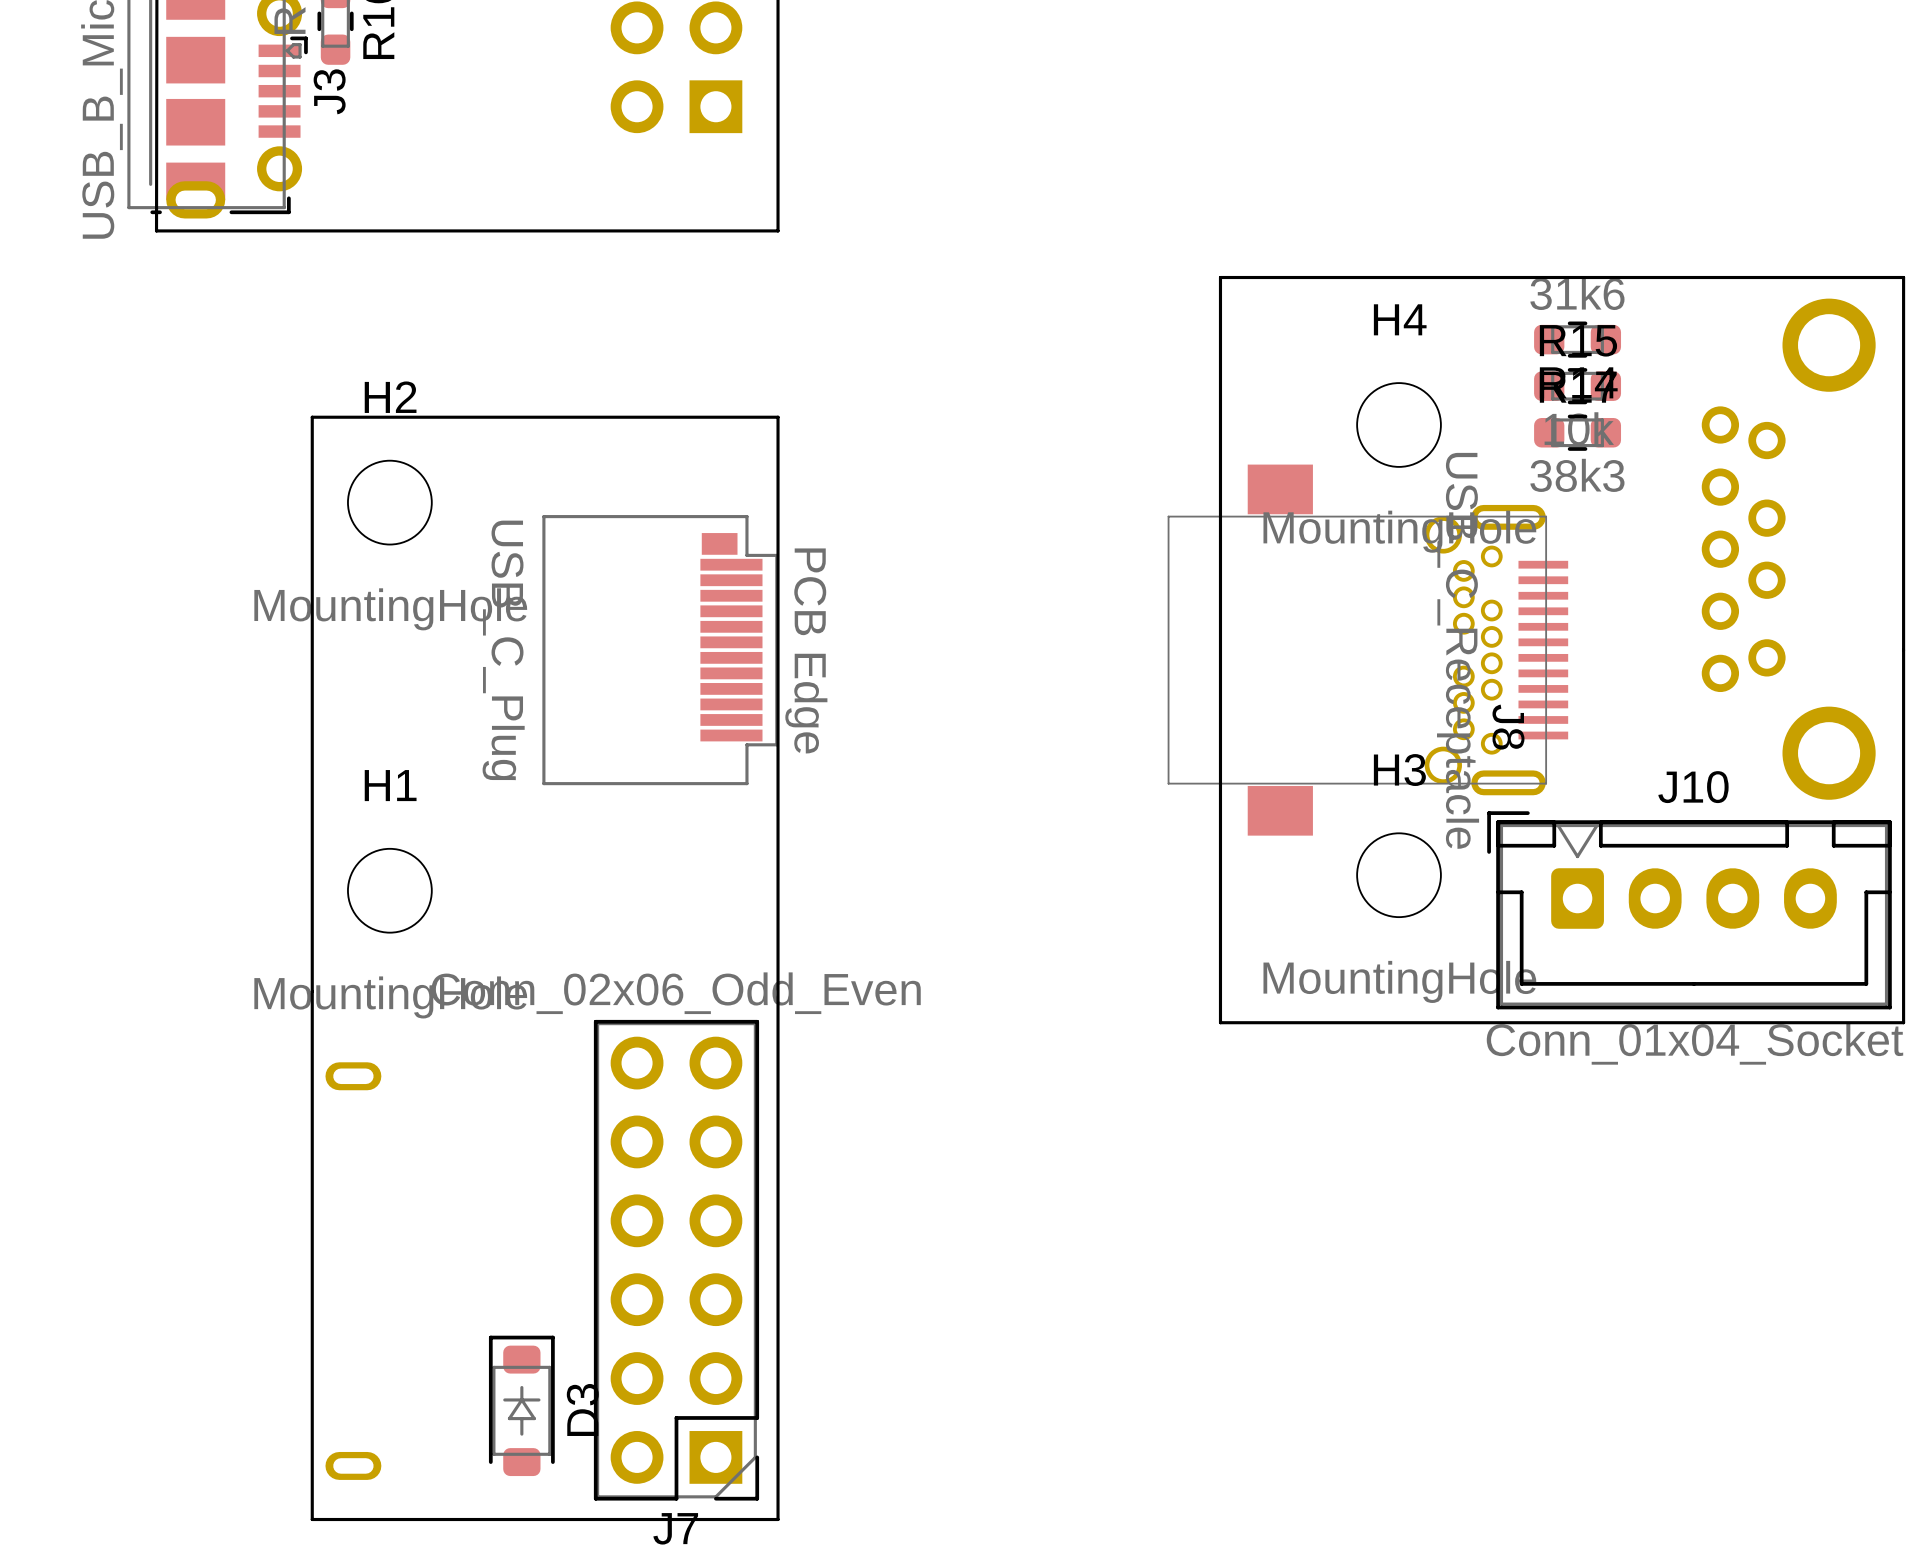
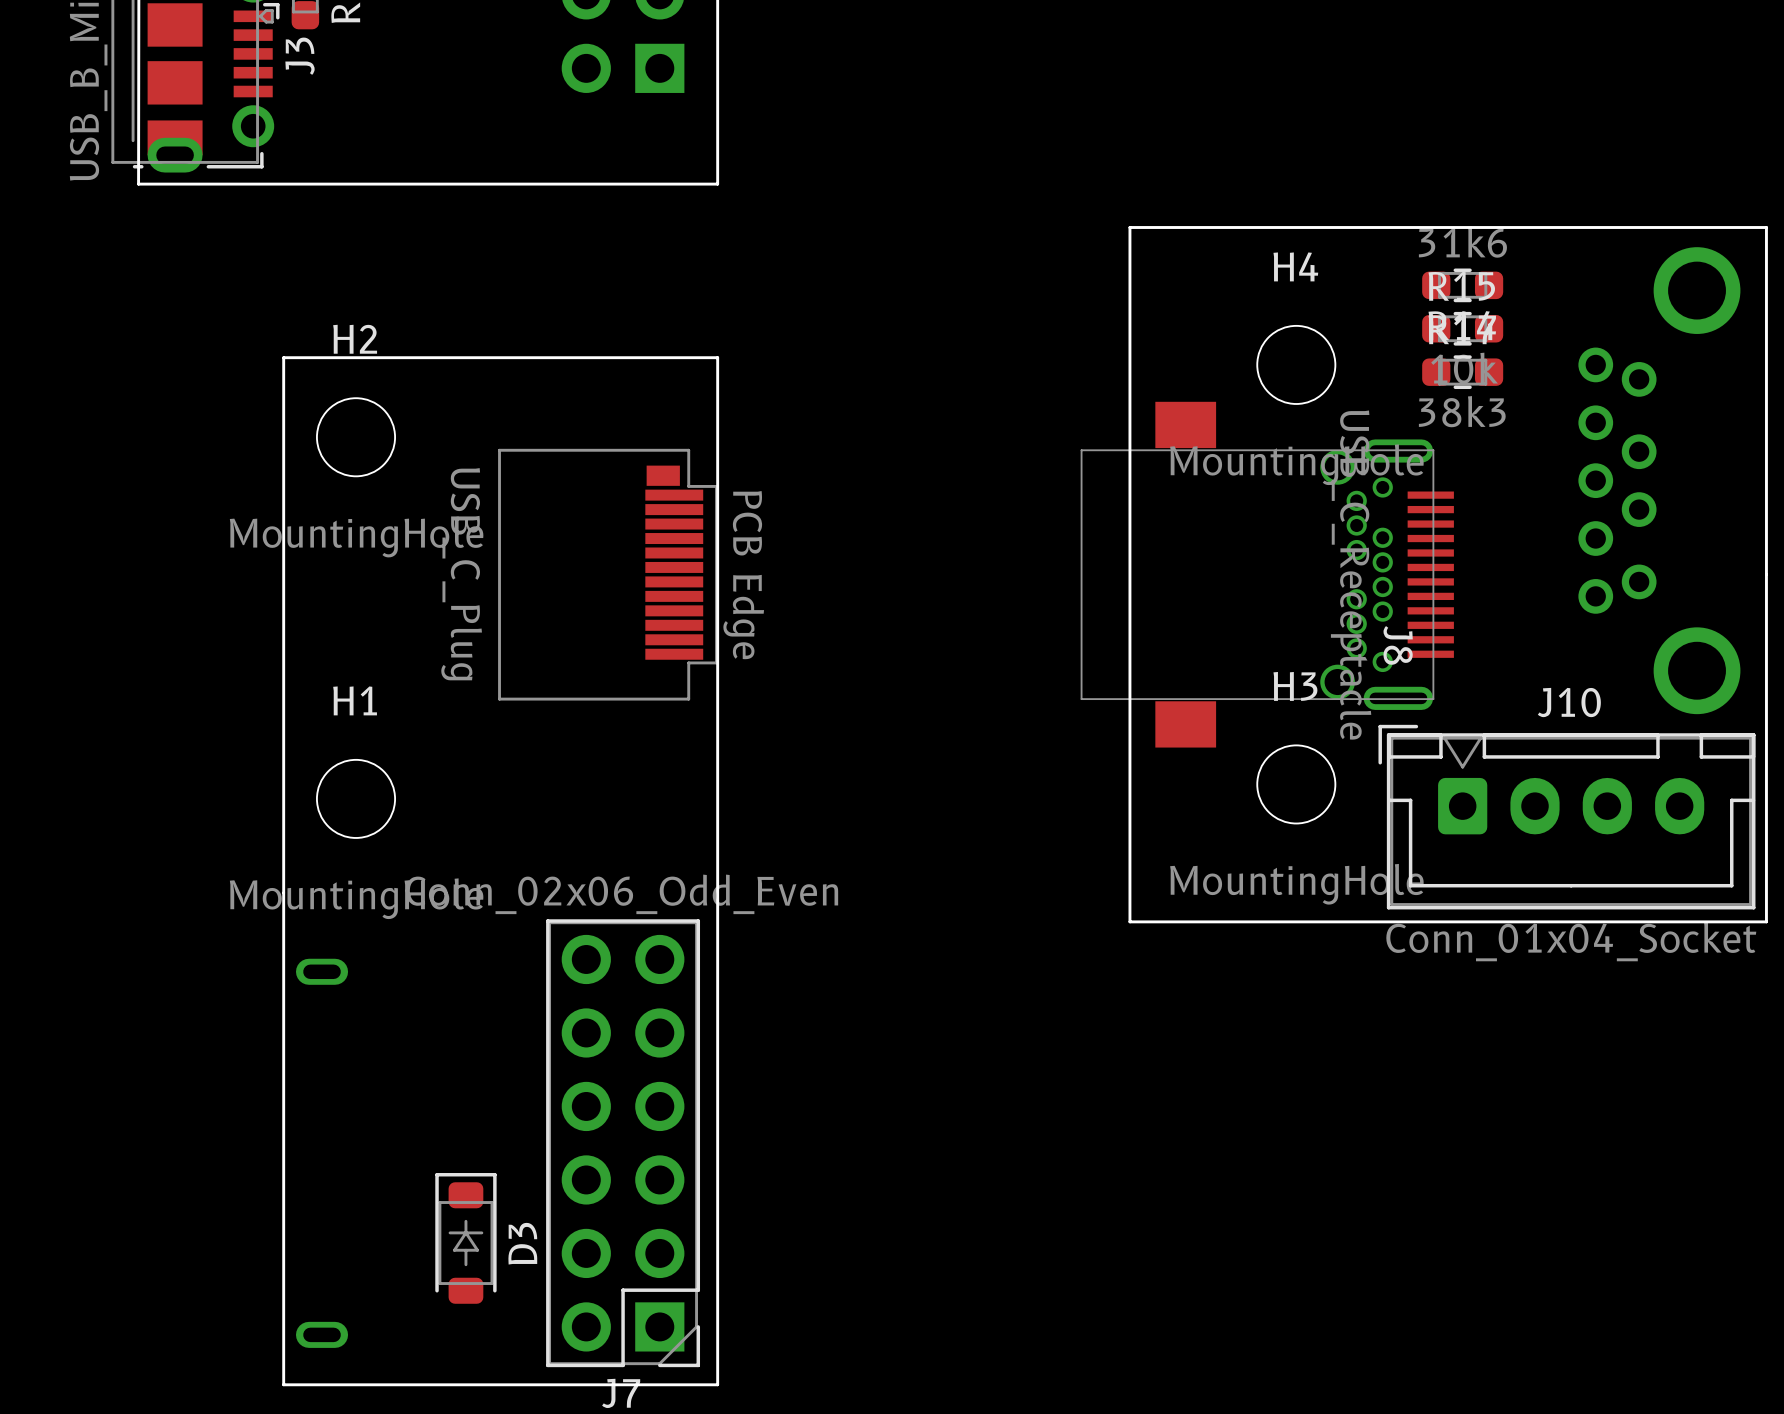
D3 position: (521, 1405) -> (465, 1238)

